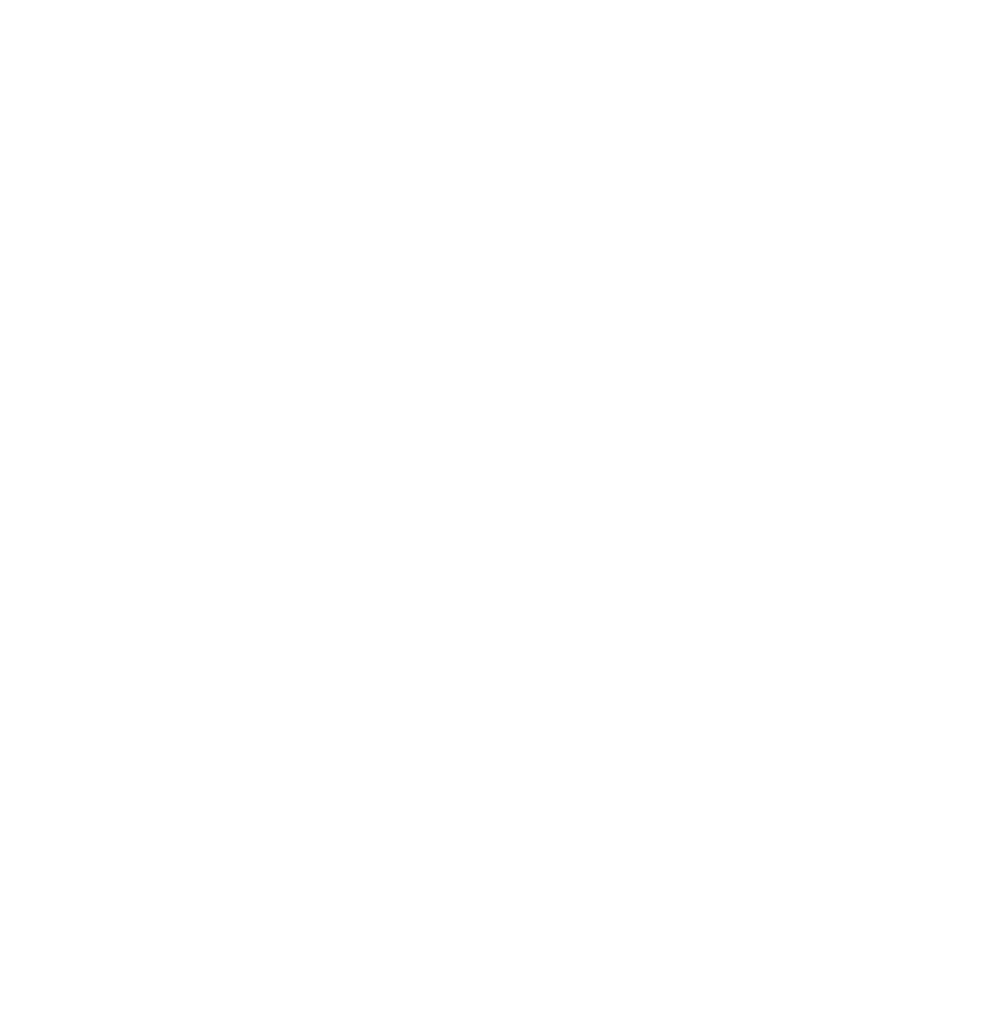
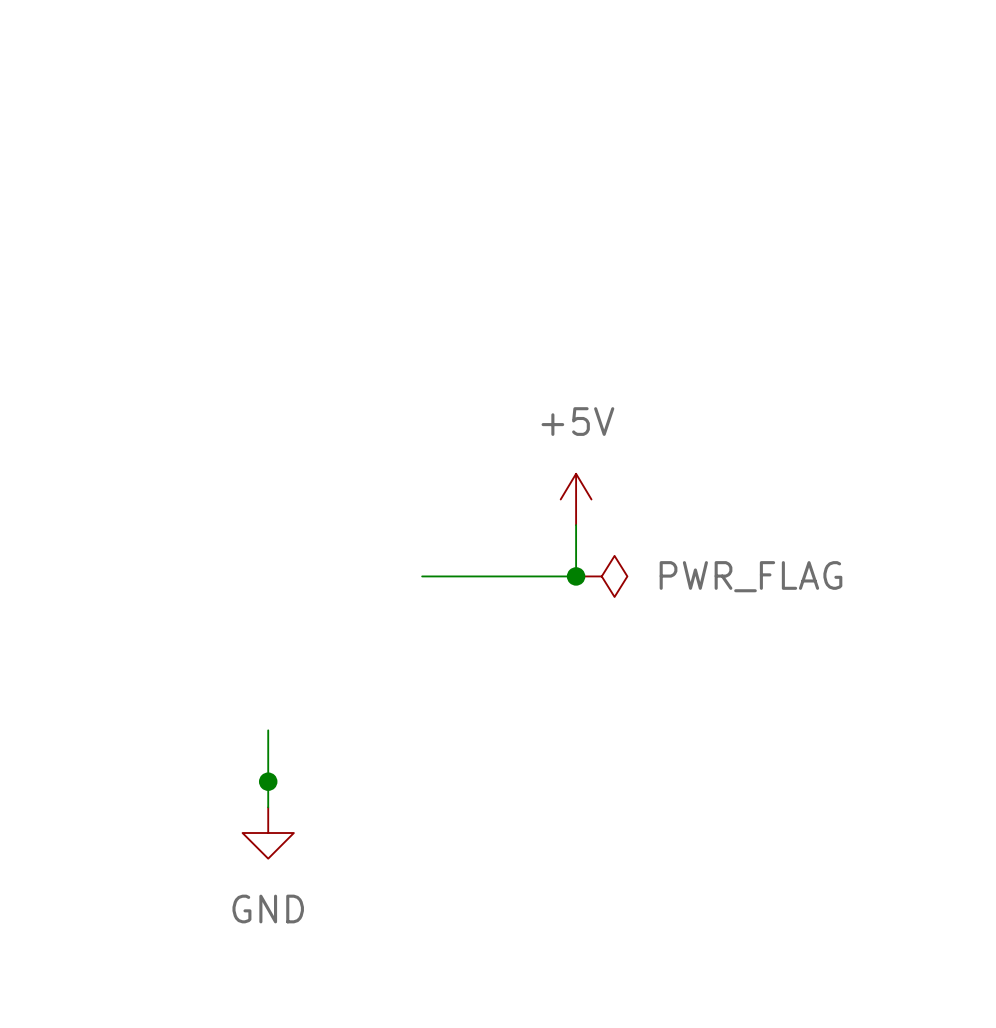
power symbol: none -> +5V (576, 499)
wire: none -> (576, 525) (576, 576) (422, 576)
junction: none -> (576, 576)
power symbol: none -> PWR_FLAG (601, 576)
wire: none -> (268, 730) (268, 807)
junction: none -> (268, 781)
power symbol: none -> GND (268, 833)

